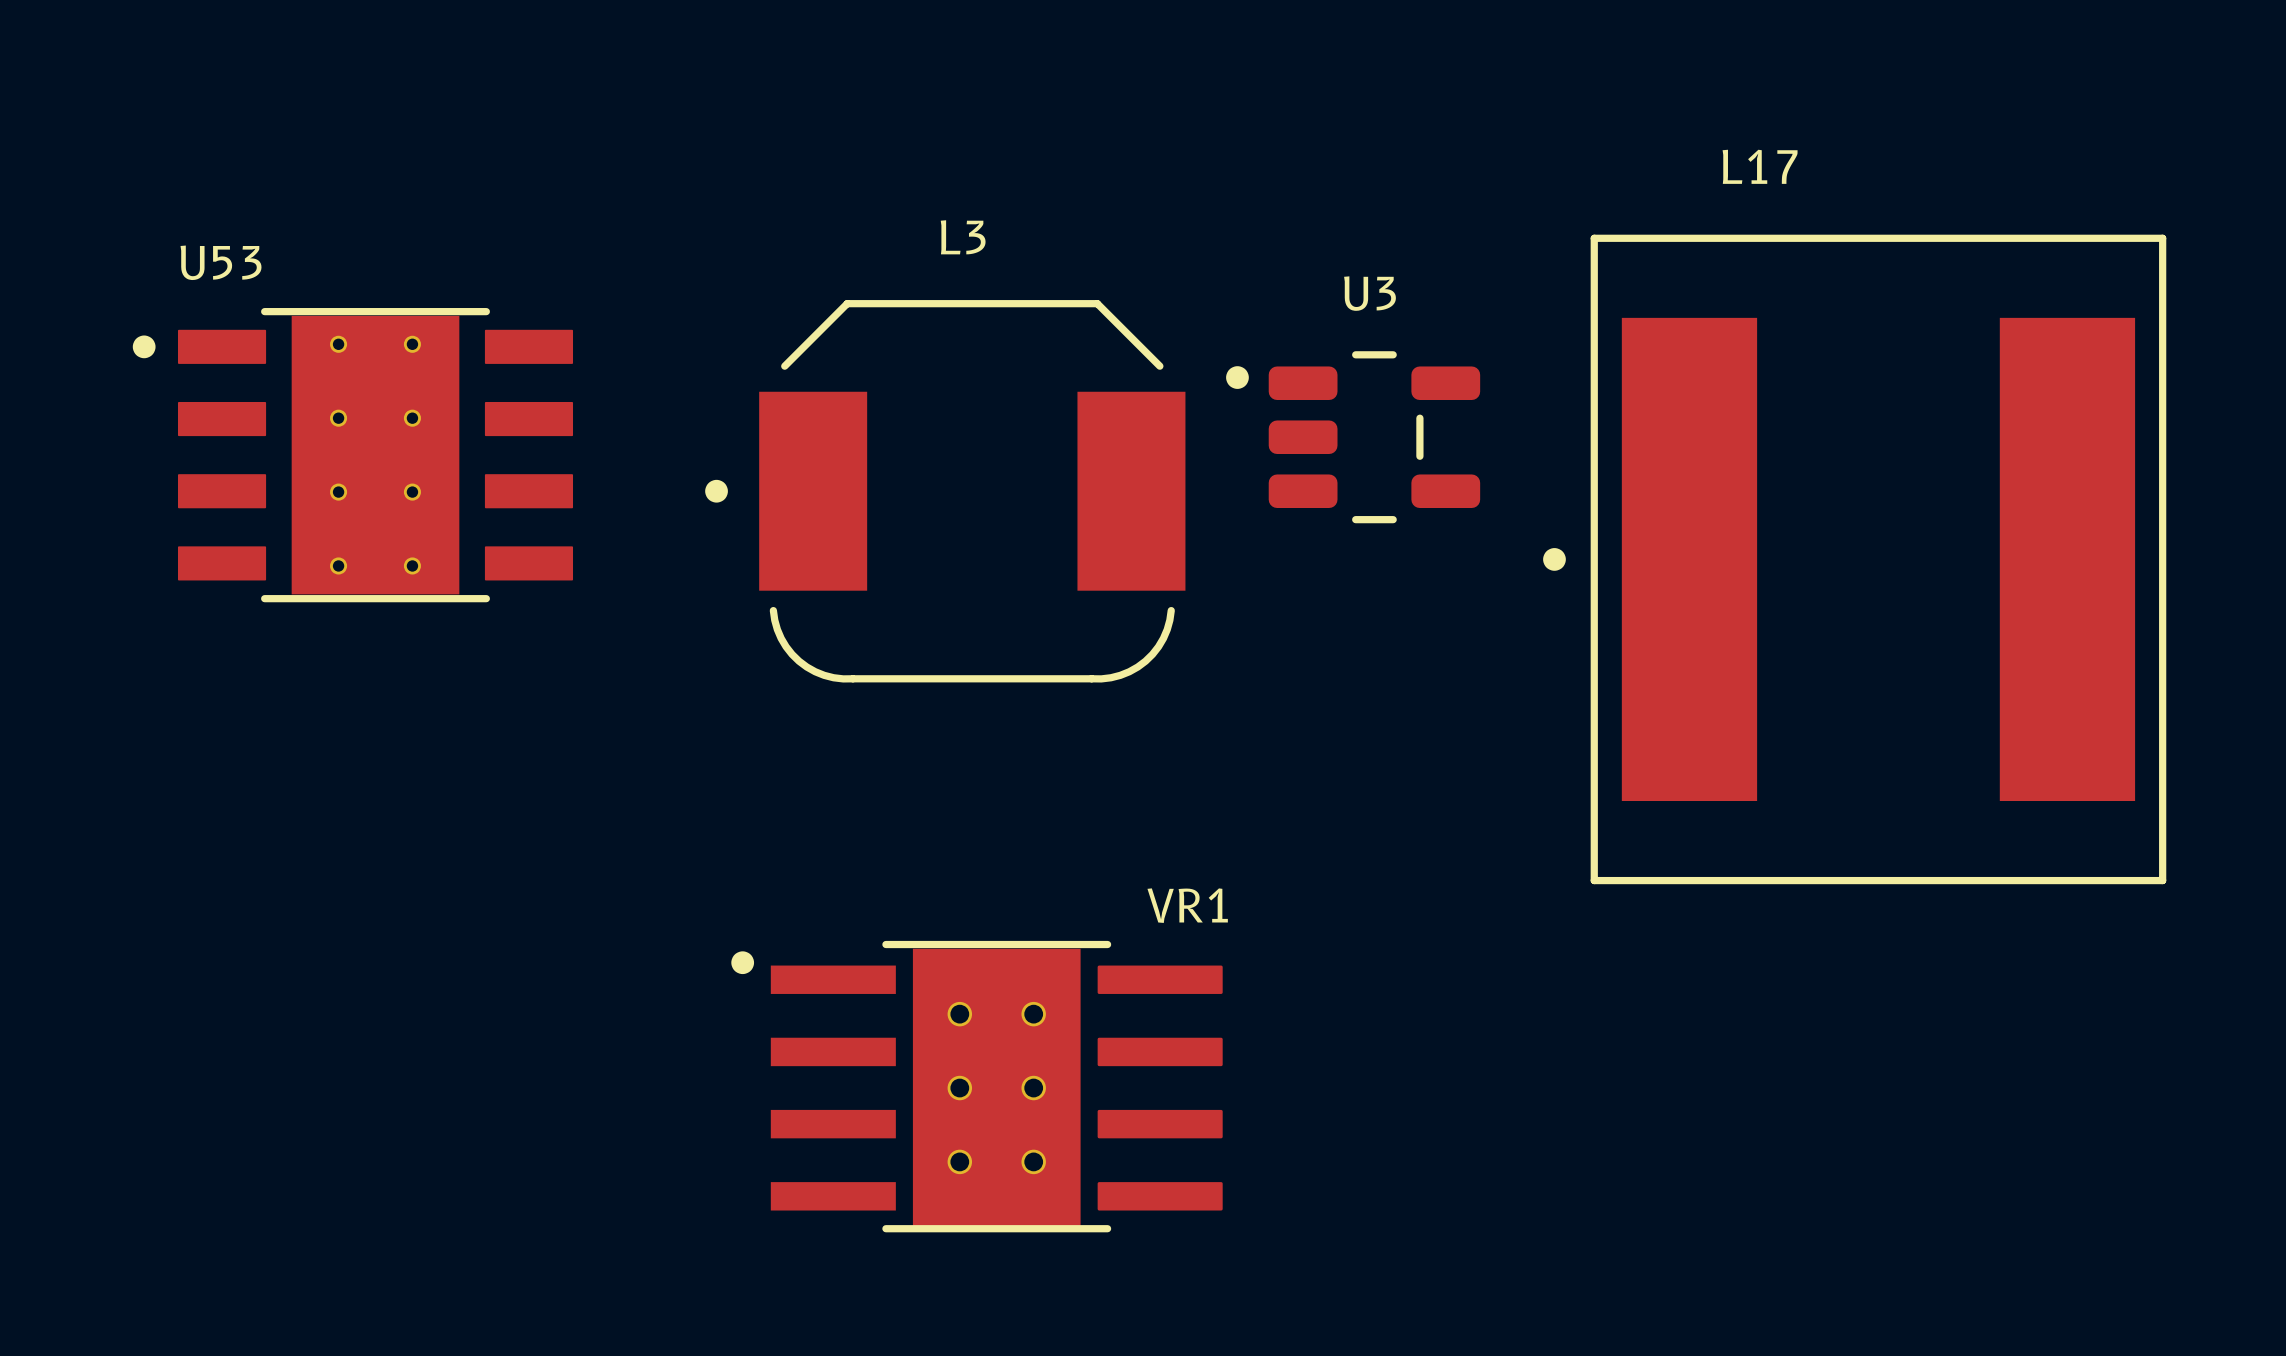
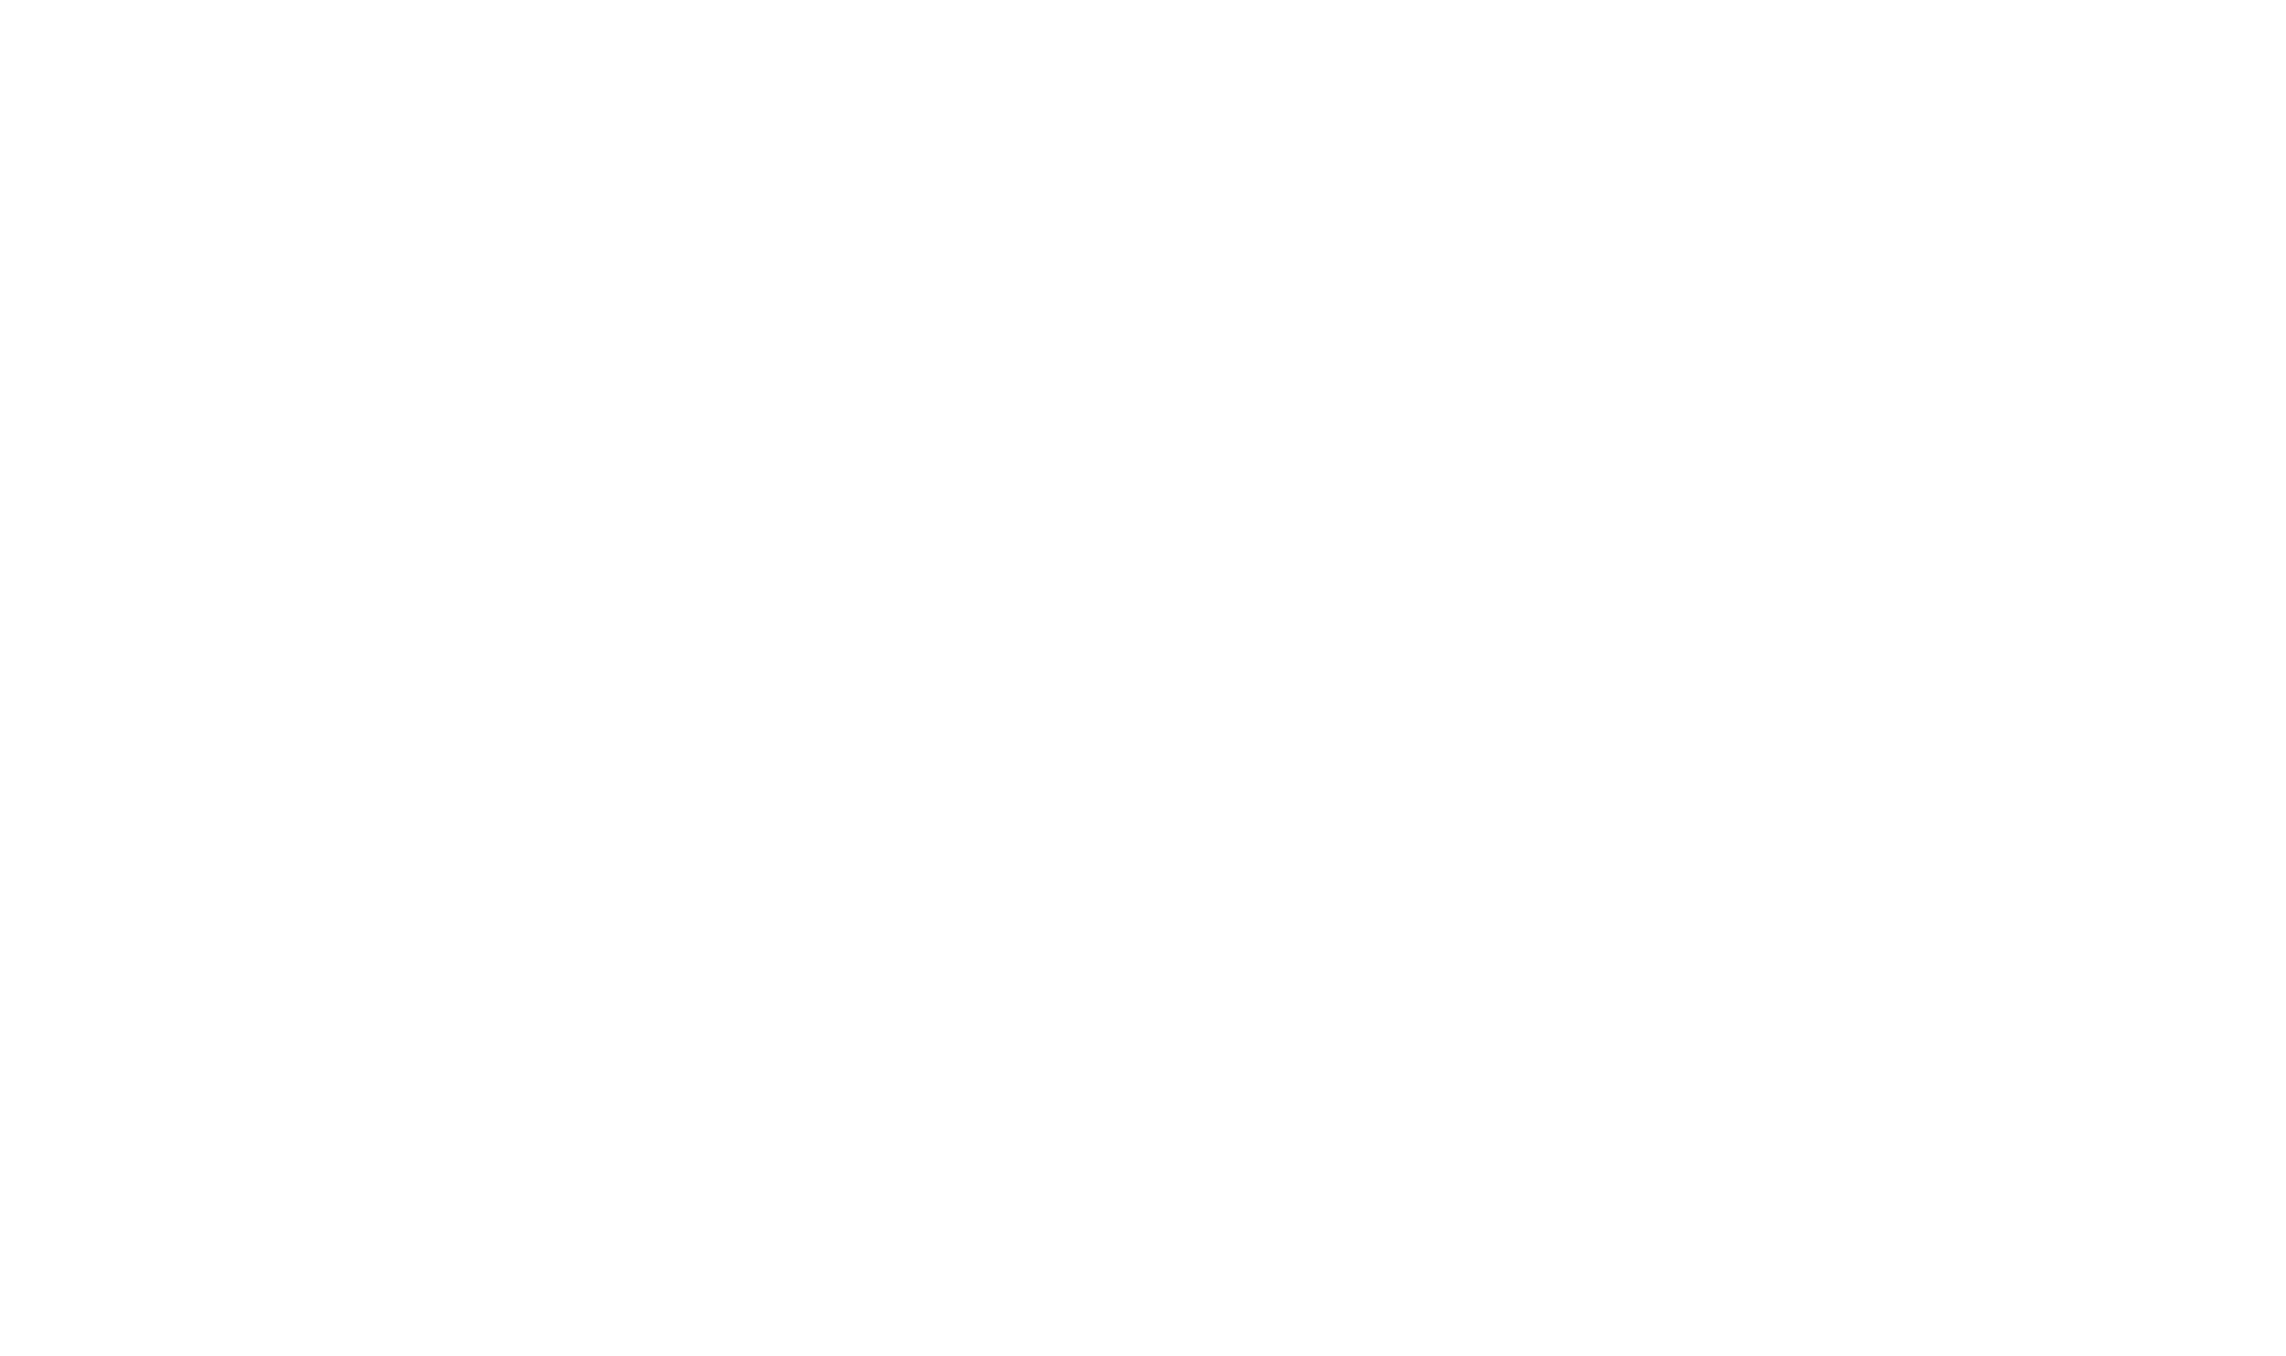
U3: (1353, 437) -> none
U53: (352, 455) -> none
L3: (945, 491) -> none
L17: (1854, 559) -> none
VR1: (977, 1086) -> none

